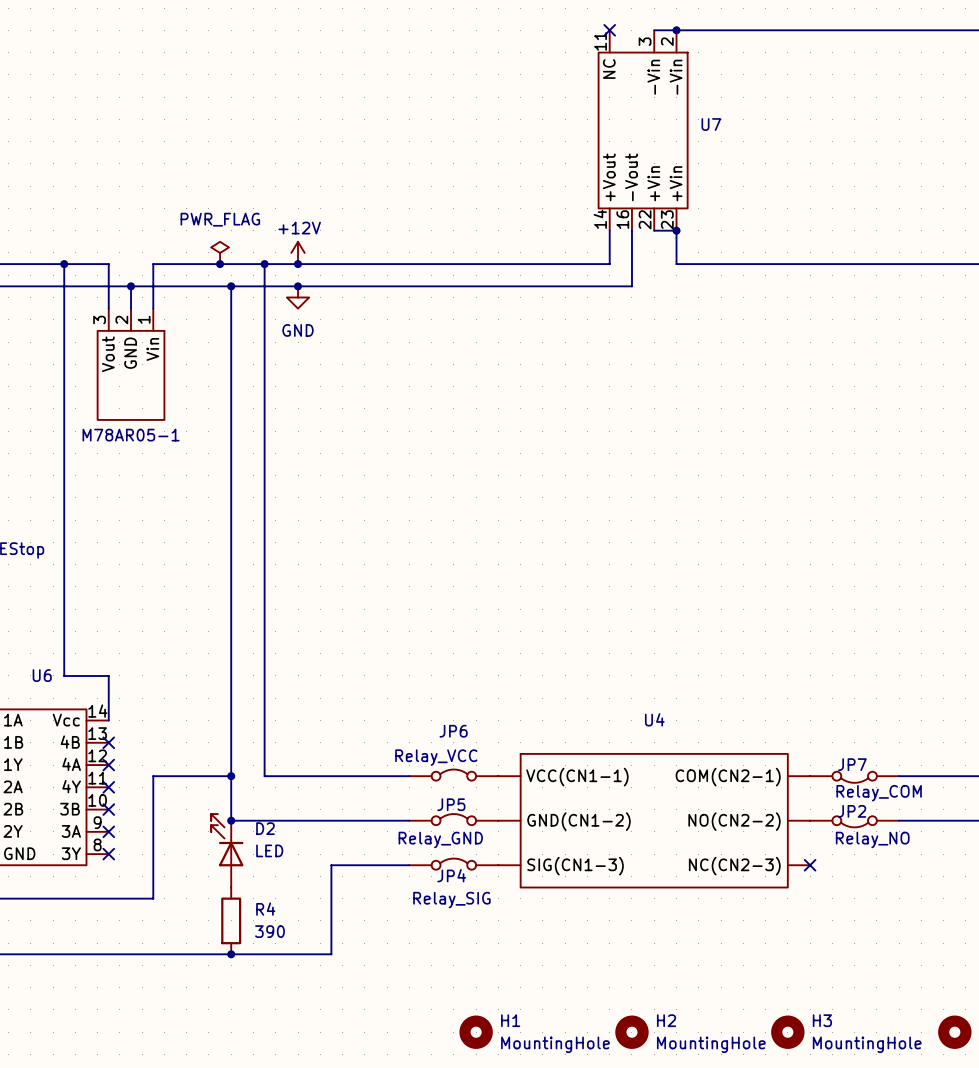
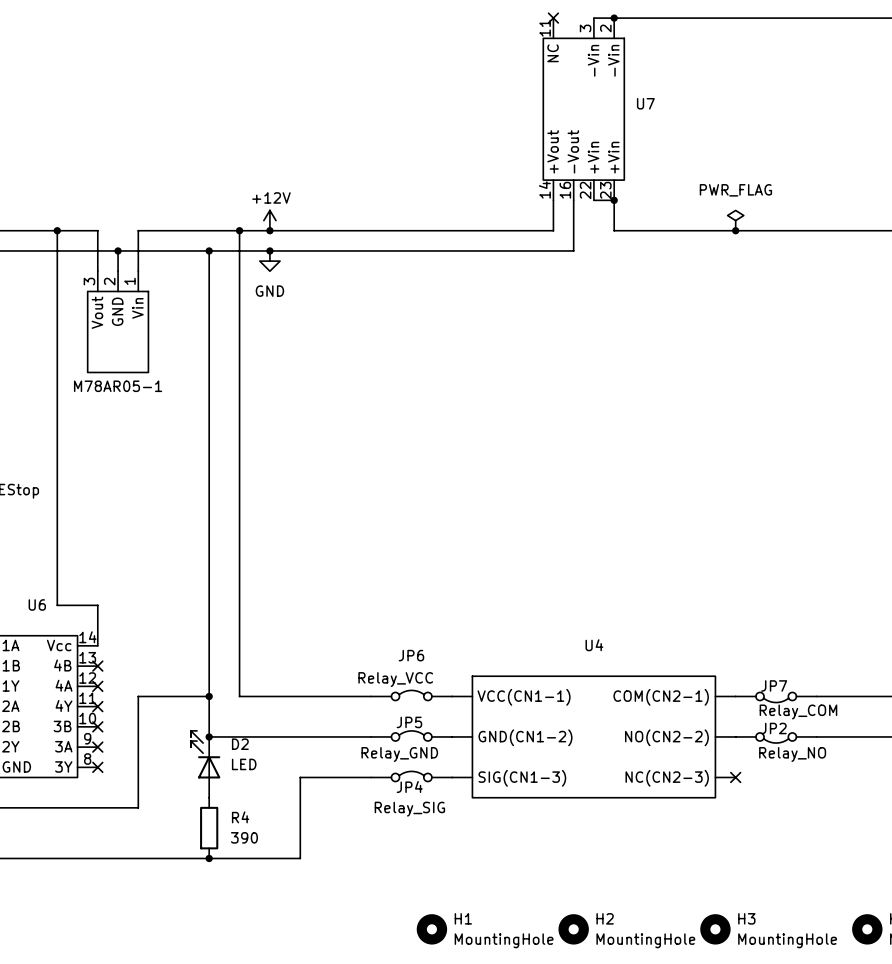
power symbol: PWR_FLAG (220, 252) -> none
power symbol: none -> PWR_FLAG (735, 220)
junction: (220, 264) -> none
junction: none -> (735, 230)

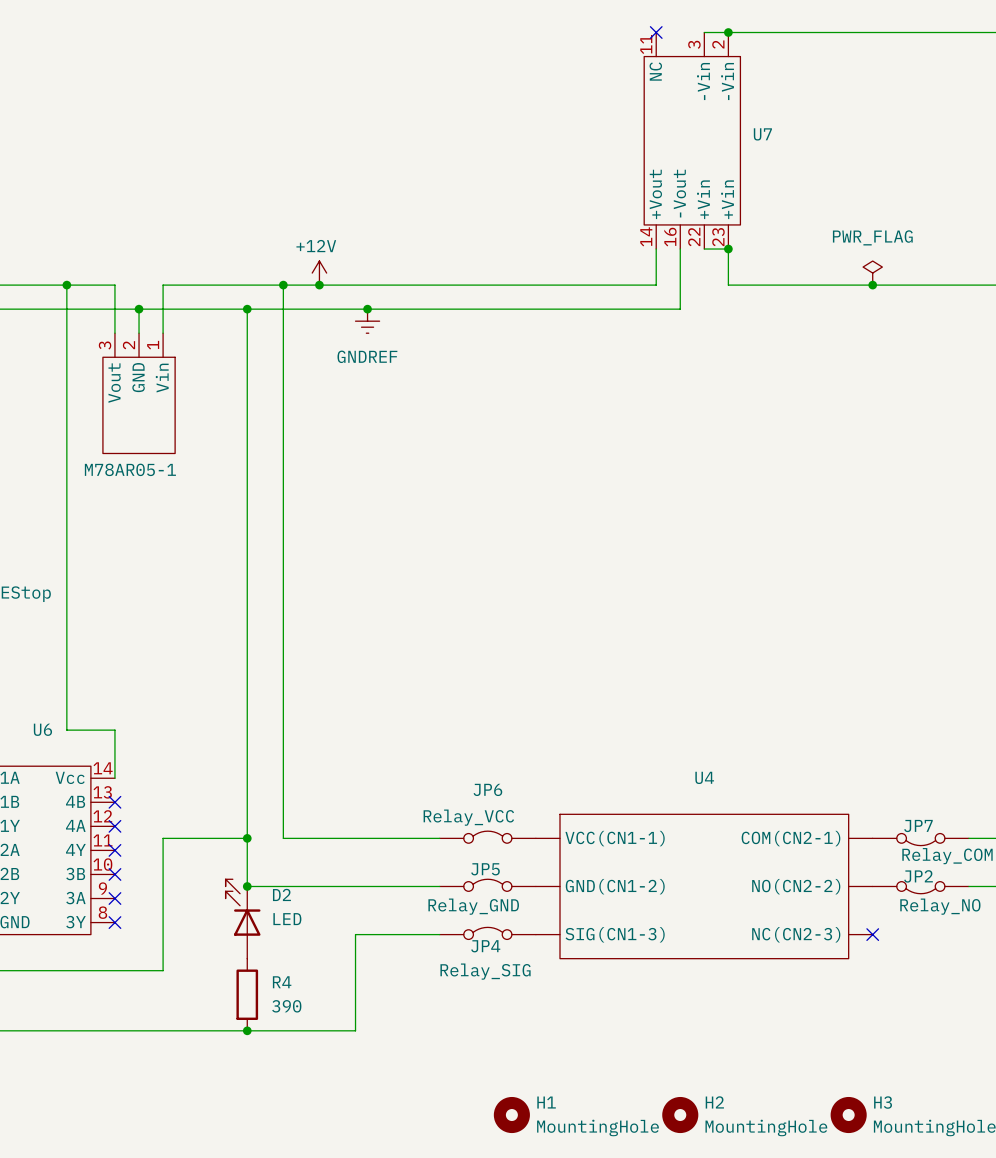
junction position: (269, 250) -> (367, 309)
power symbol: GND (269, 261) -> none
power symbol: none -> GNDREF (367, 321)

